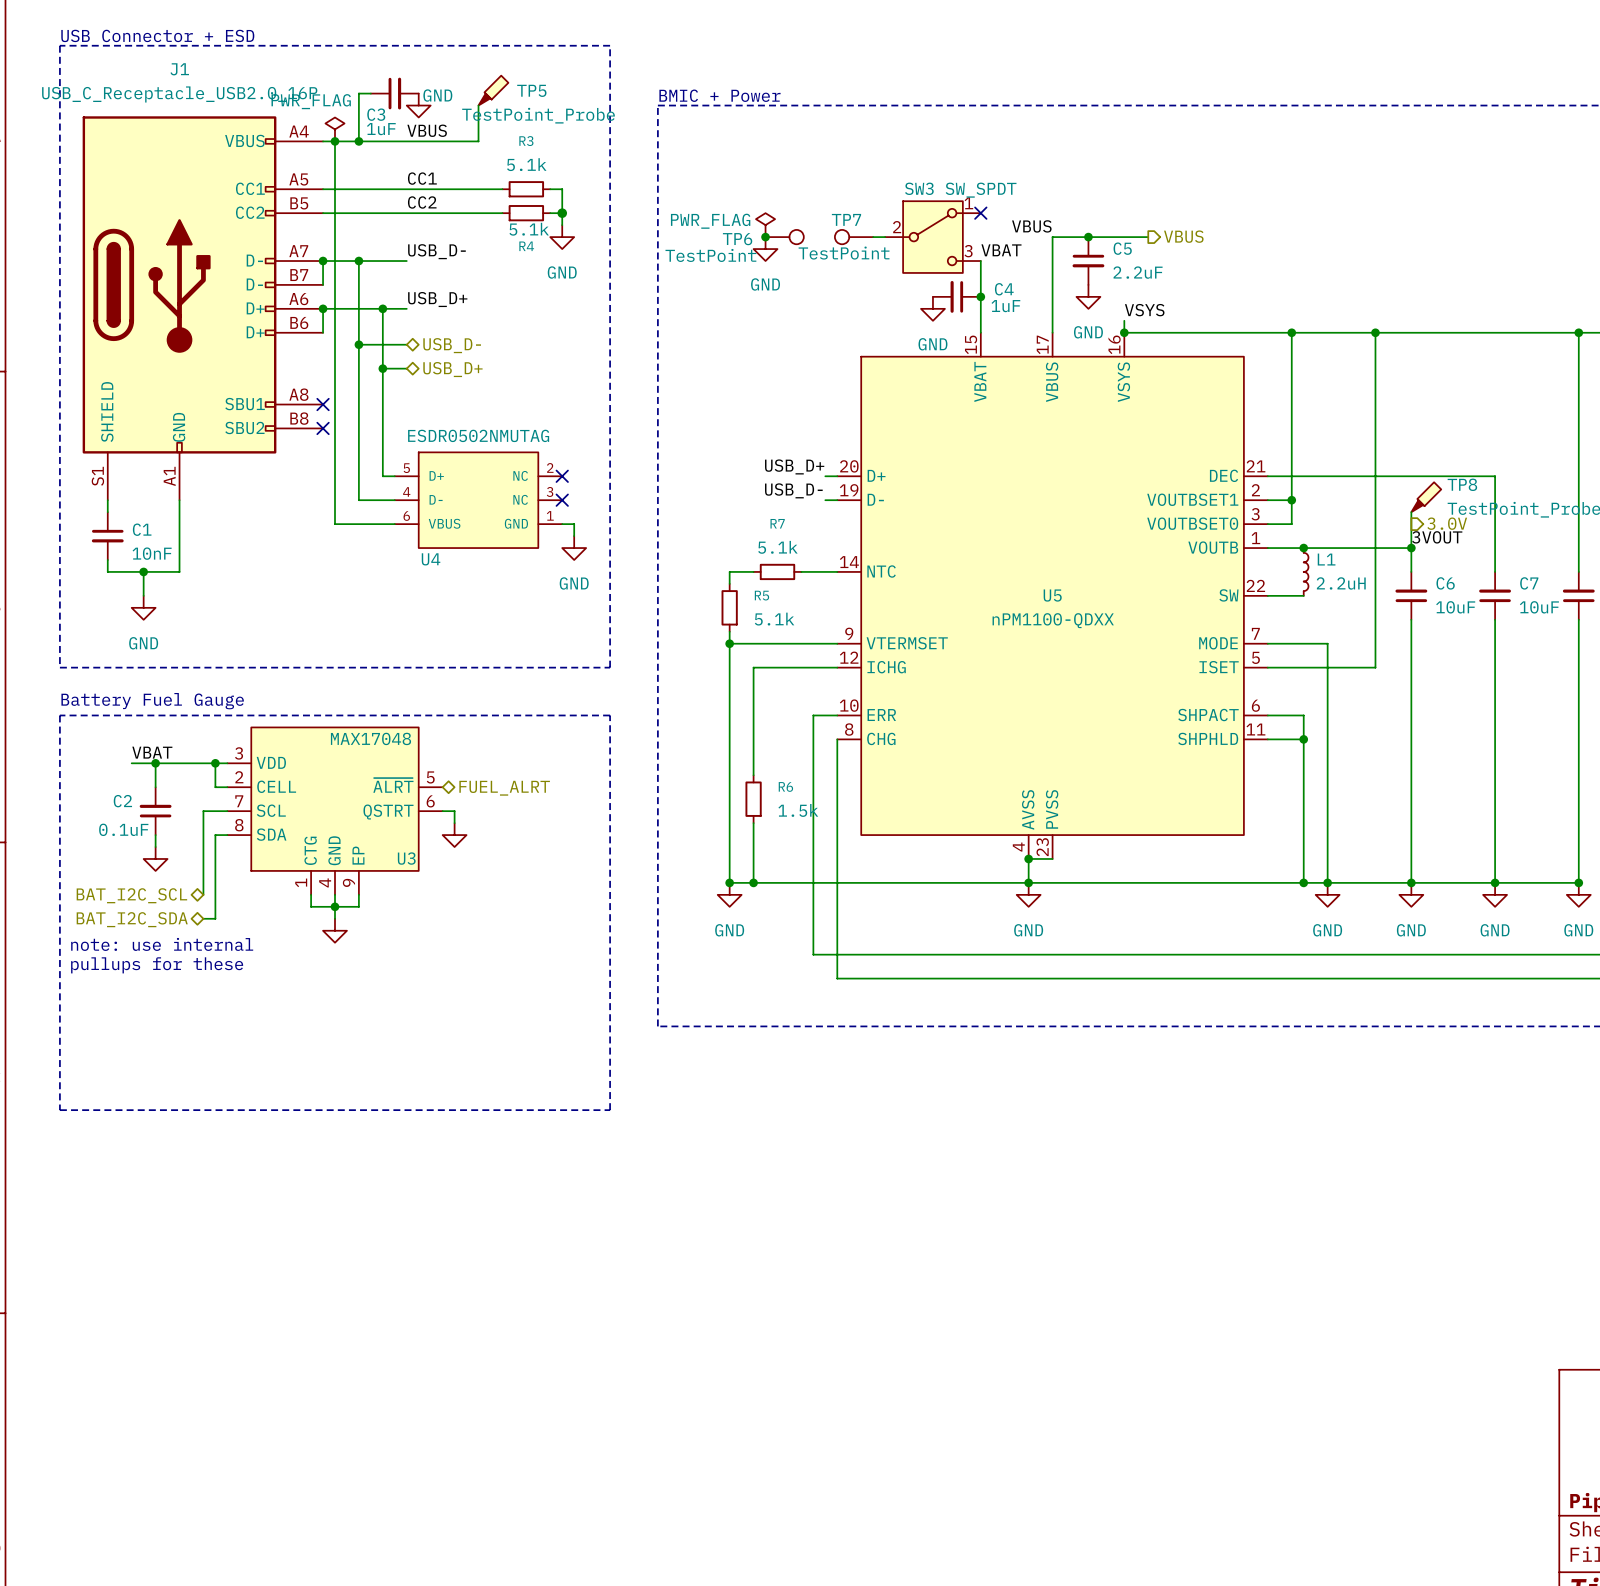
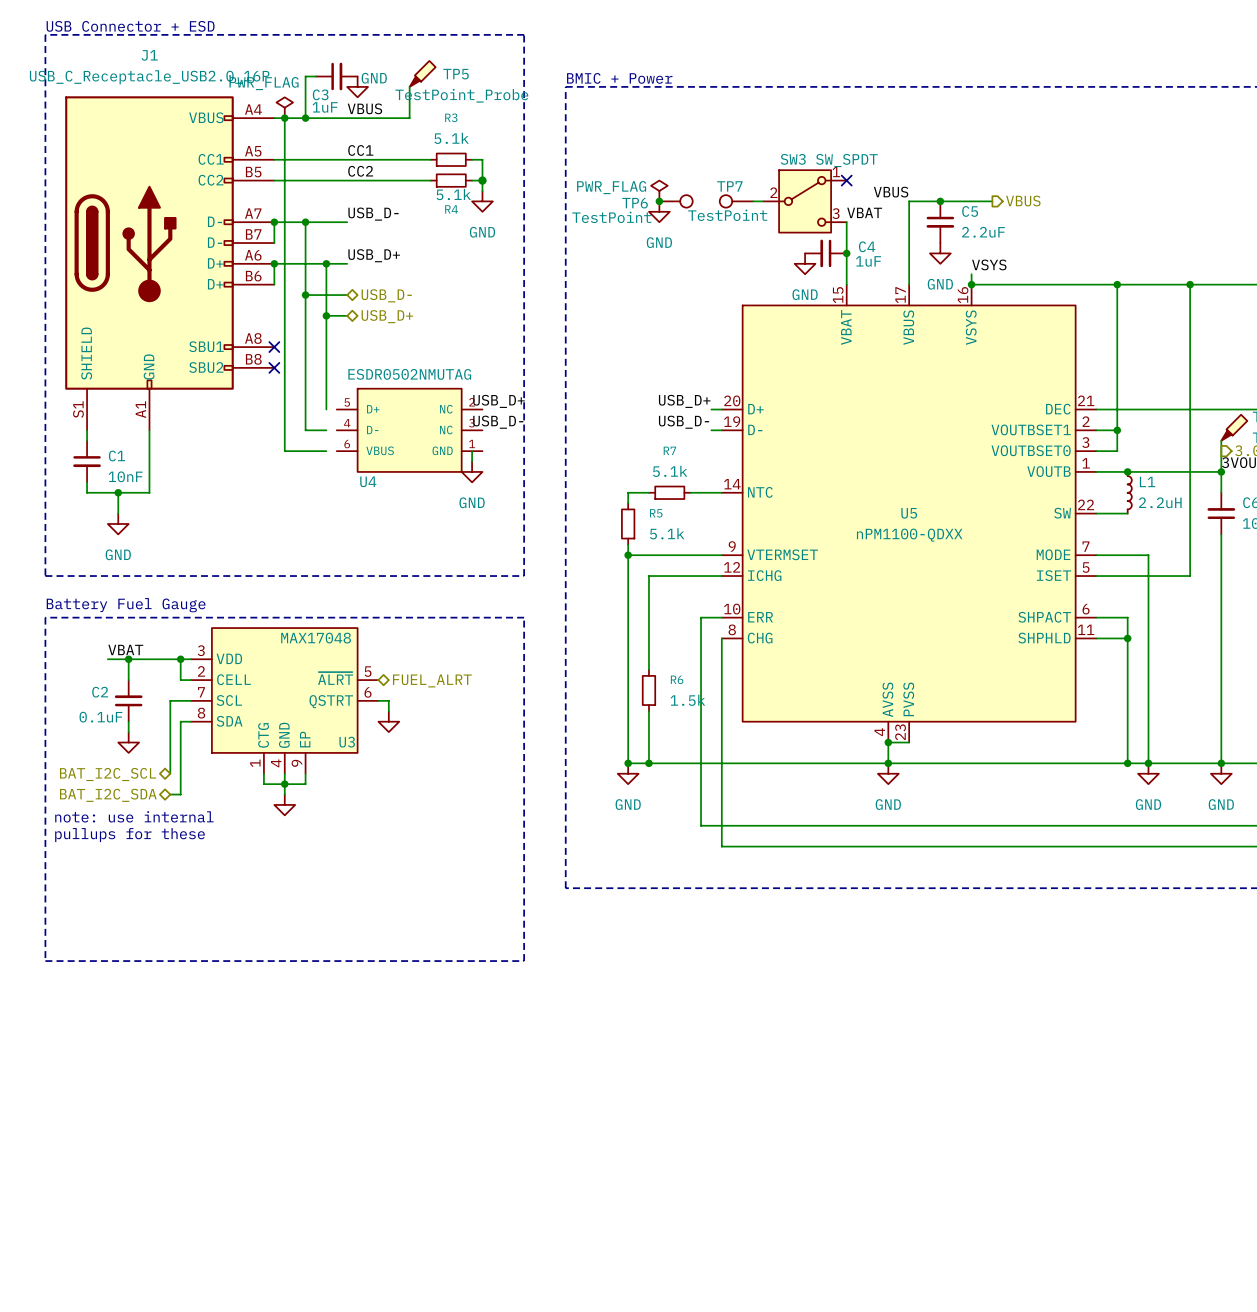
label: none -> USB_D+ (499, 401)
wire: (382, 476) (394, 476) -> none
no-connect mark: (562, 476) -> none
label: none -> USB_D- (498, 422)
wire: (382, 500) (394, 500) -> none
no-connect mark: (562, 500) -> none
wire: (382, 524) (394, 524) -> none
wire: none -> (472, 451) (472, 461)
wire: (562, 524) (574, 524) (574, 536) -> none
power symbol position: GND (574, 548) -> GND (472, 471)

